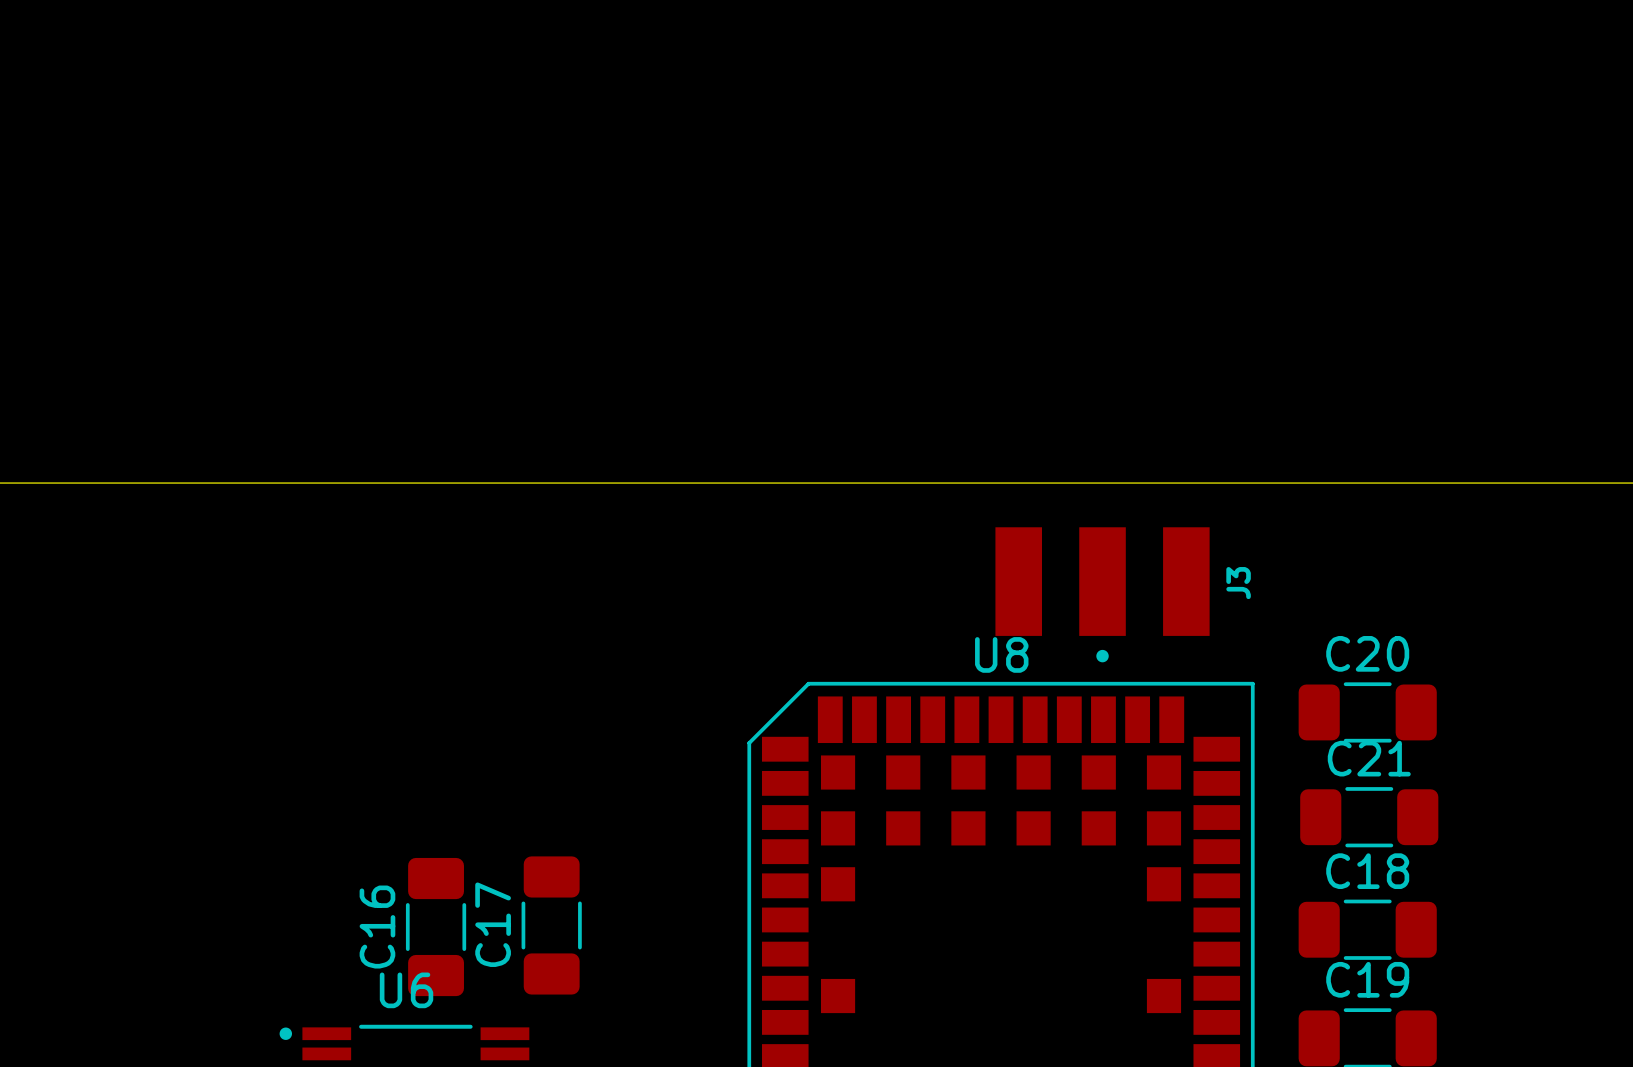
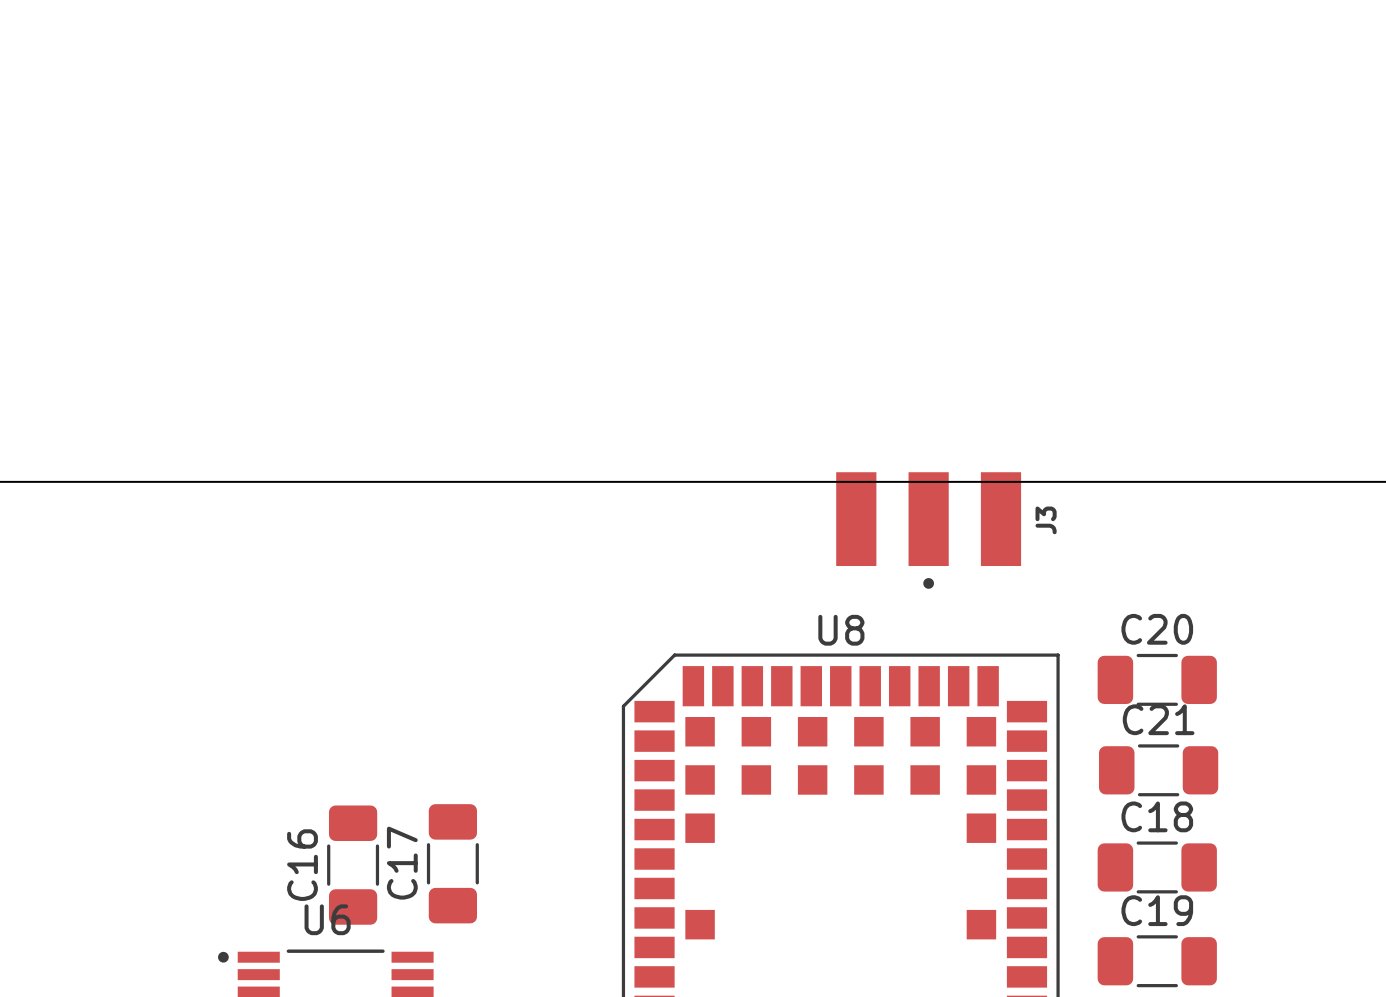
J3 position: (1102, 594) -> (928, 530)

